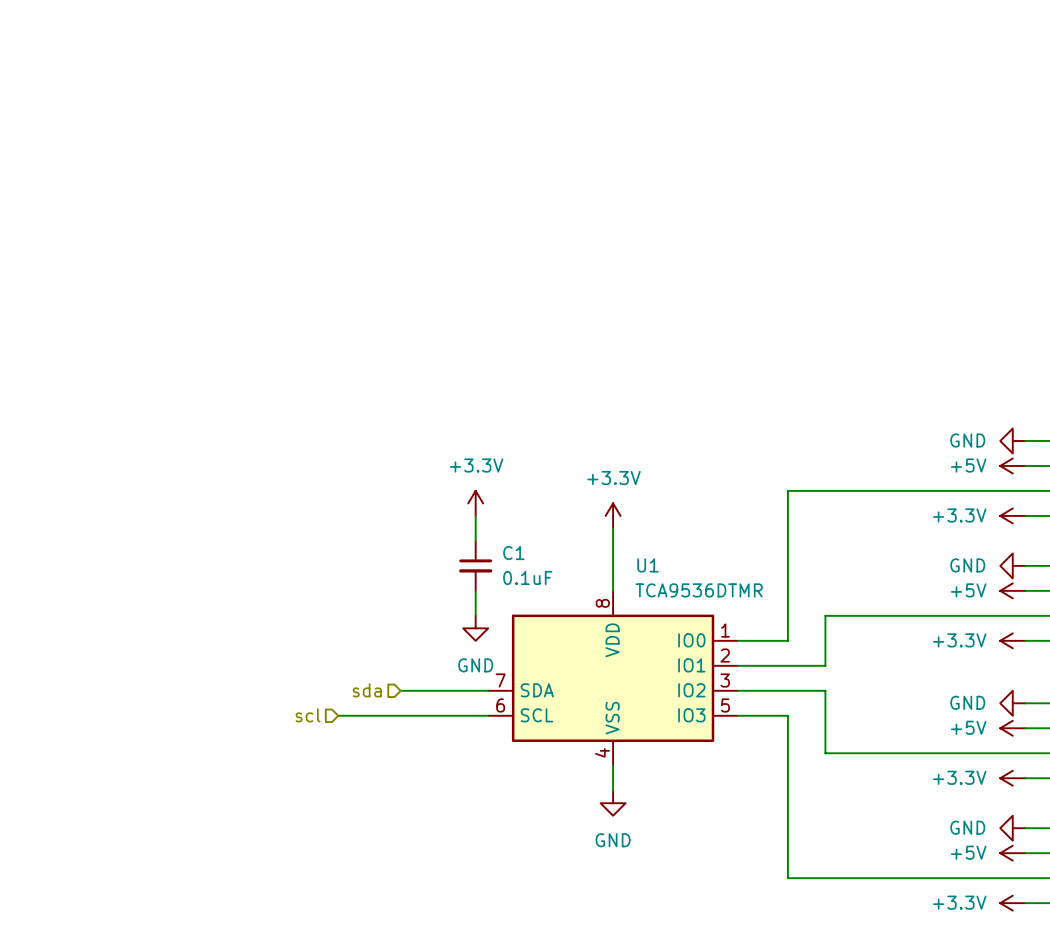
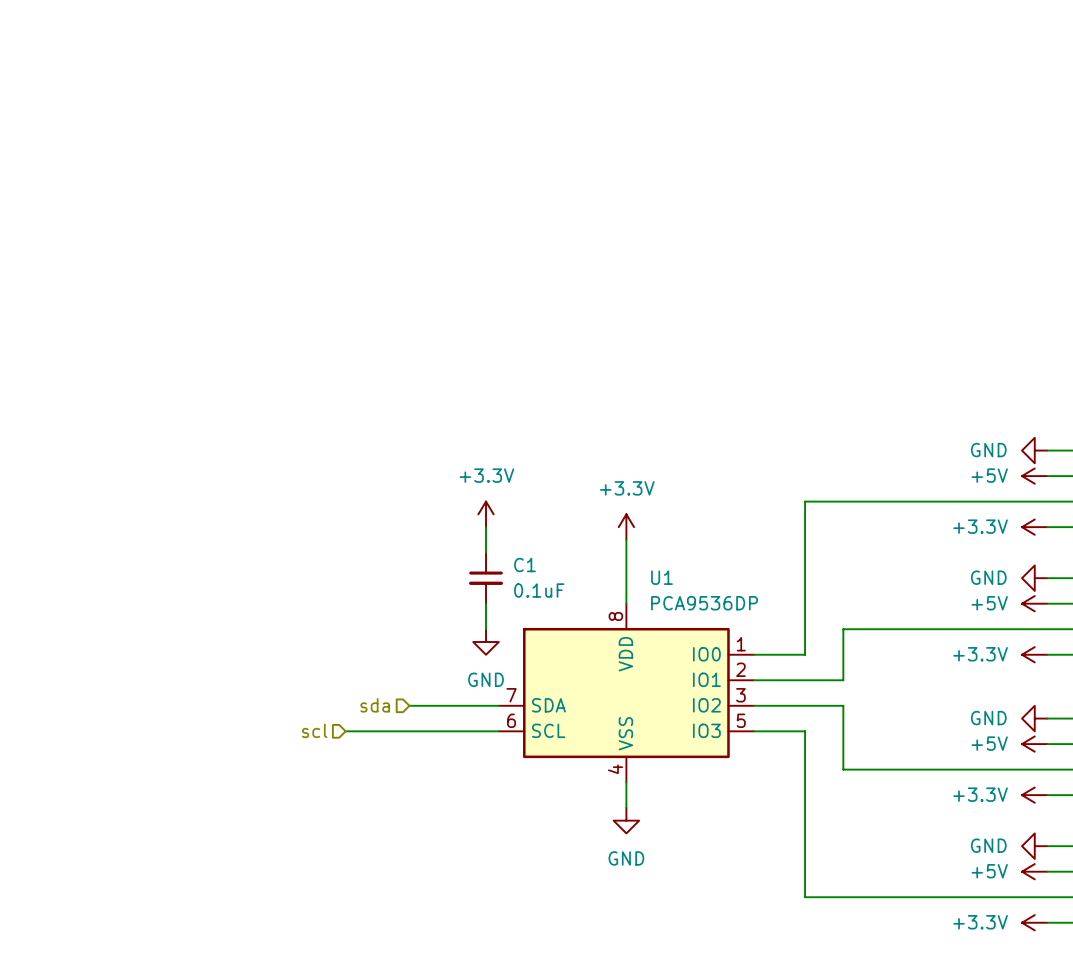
U1 value: TCA9536DTMR (699, 590) -> PCA9536DP (704, 603)

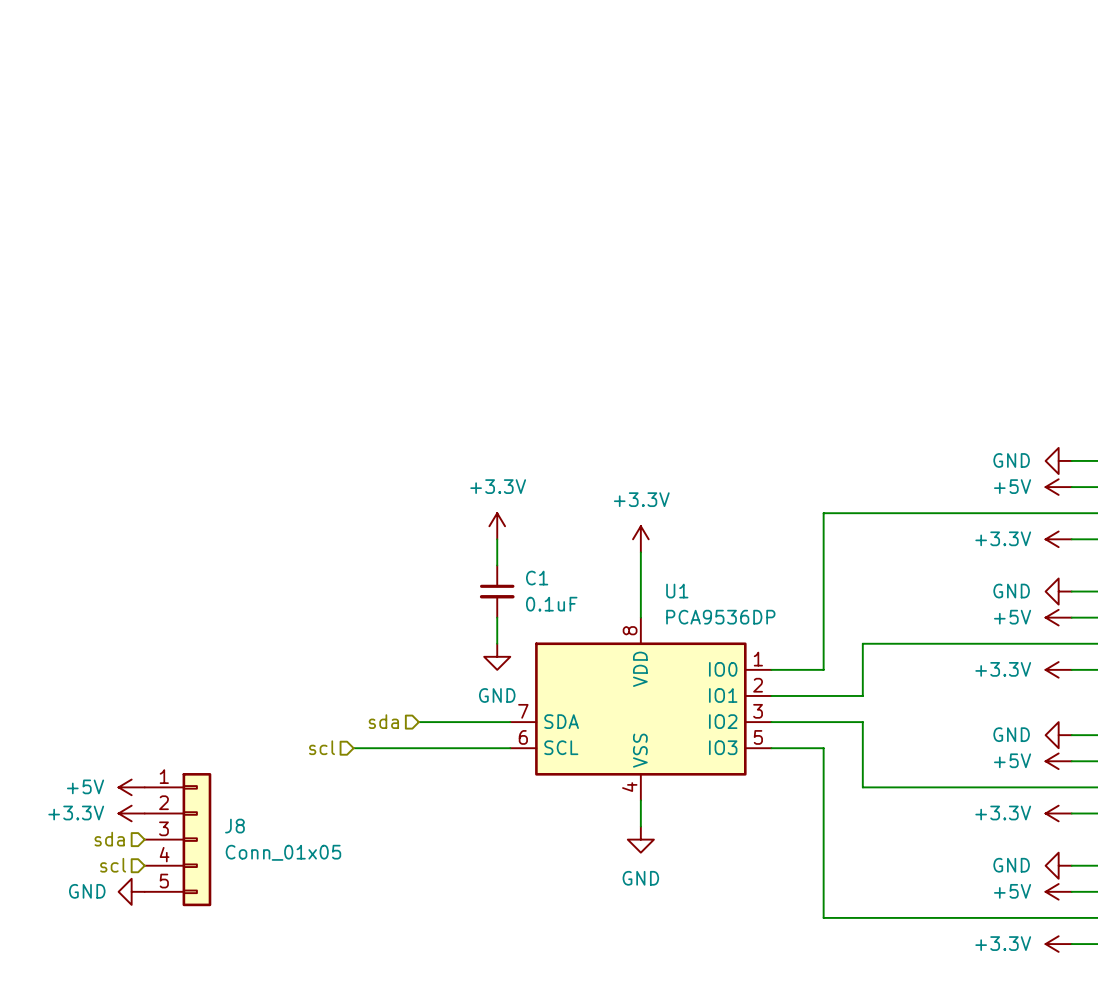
power symbol: none -> +5V (131, 787)
power symbol: none -> +3.3V (131, 813)
hierarchical label: none -> sda (109, 839)
J8: none -> Conn_01x05 (178, 839)
hierarchical label: none -> scl (113, 865)
power symbol: none -> GND (131, 891)

